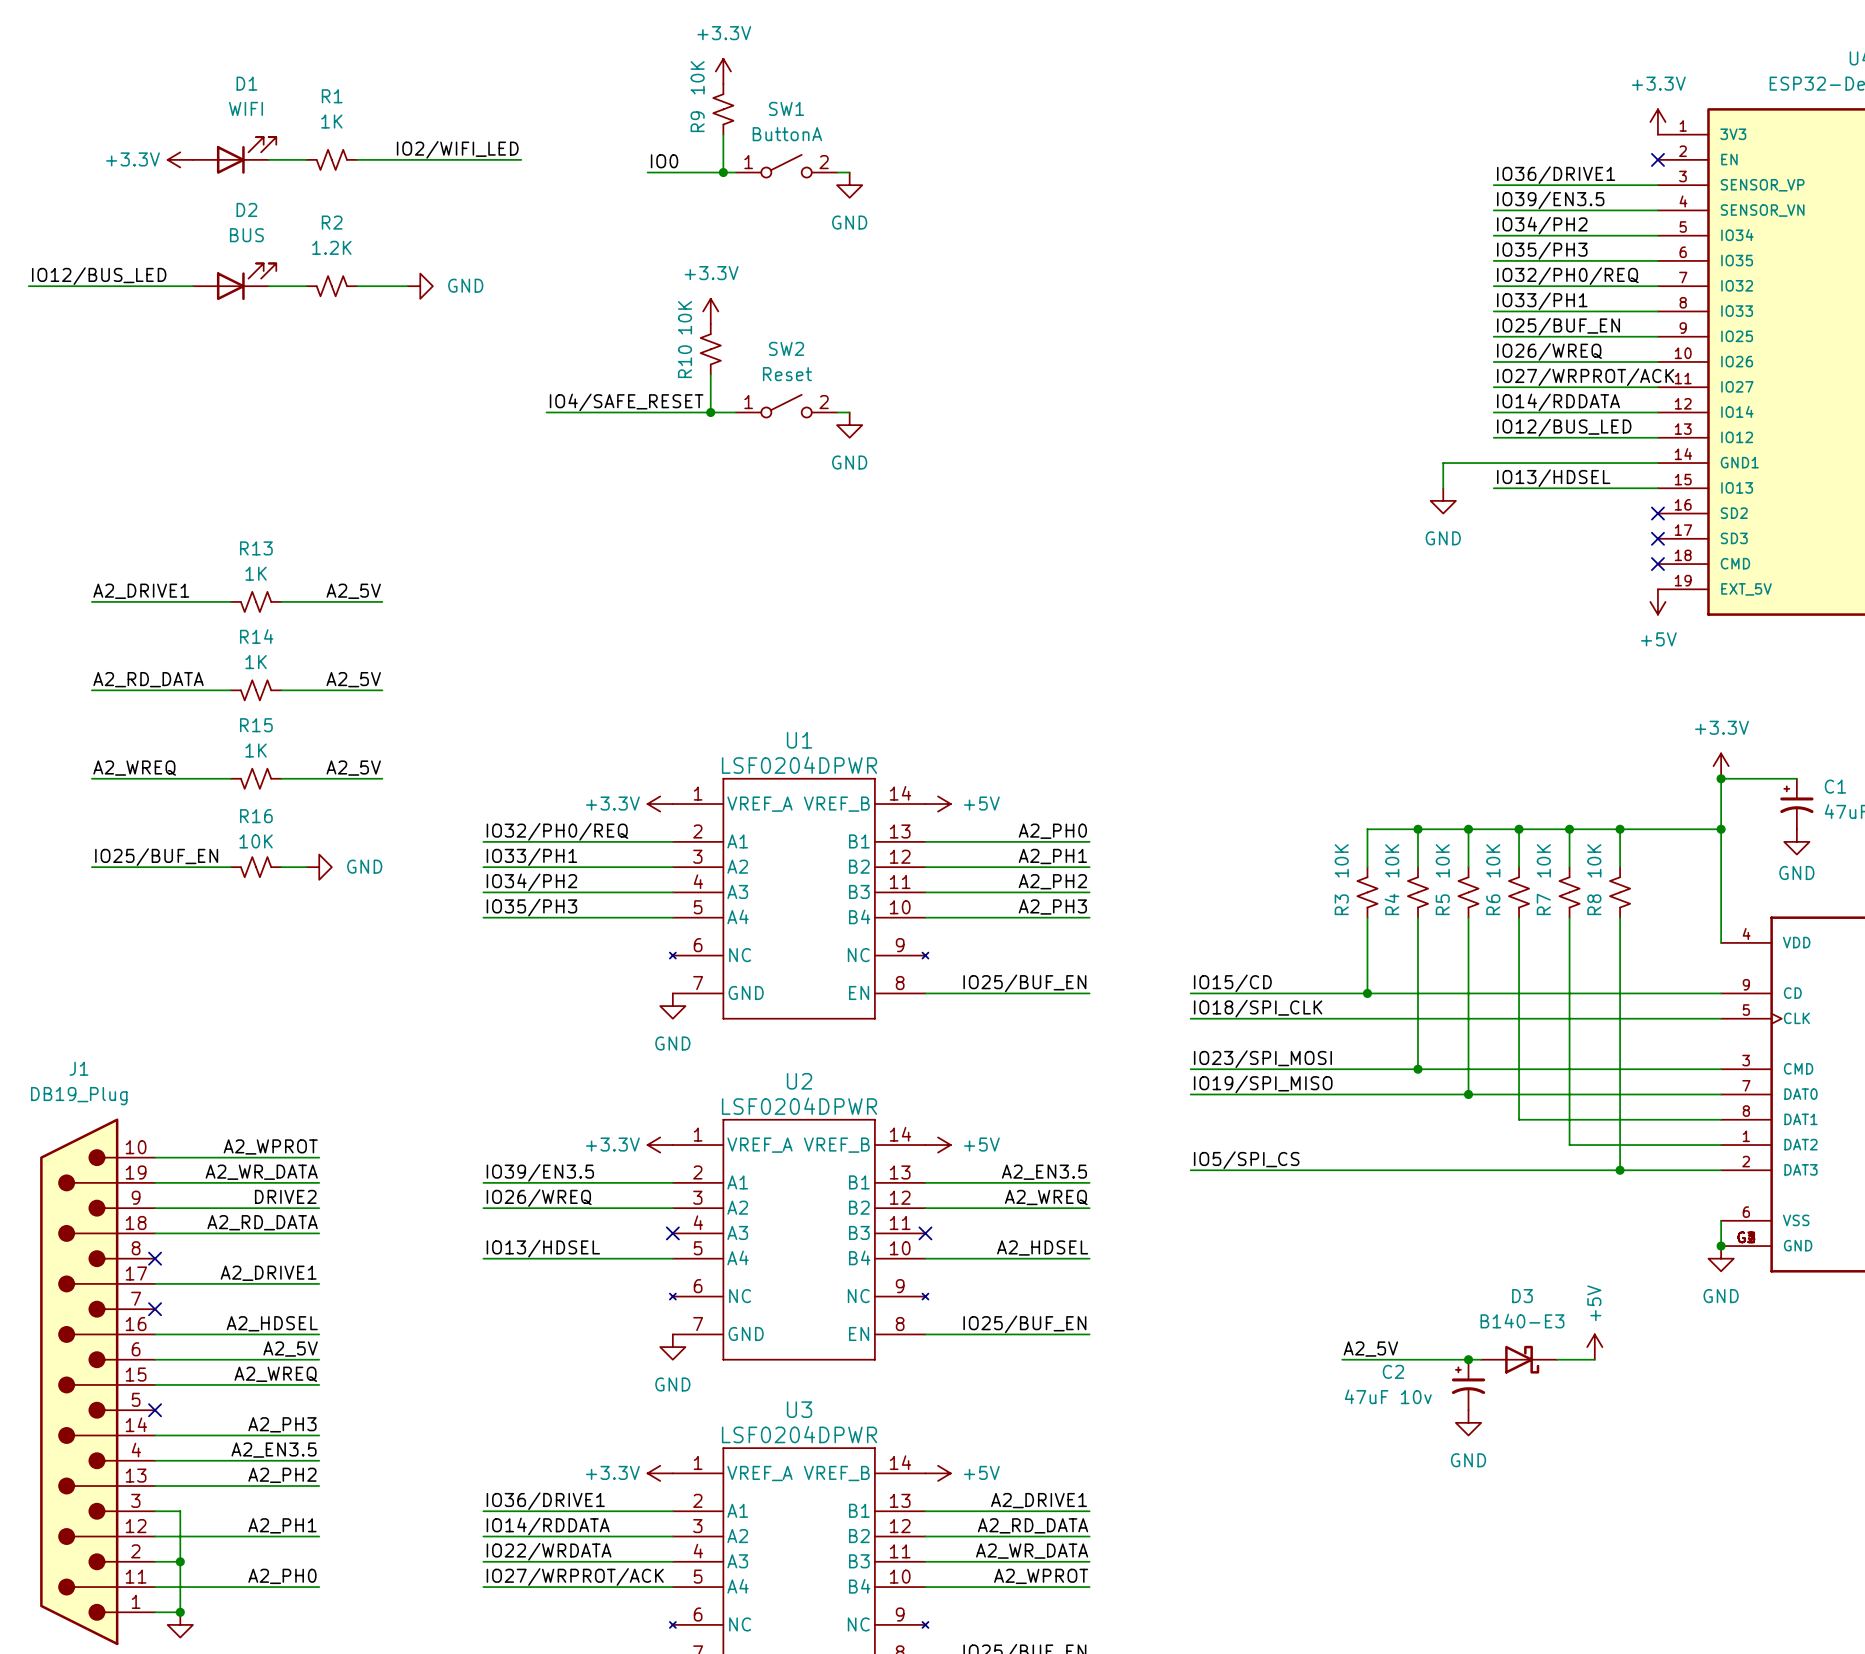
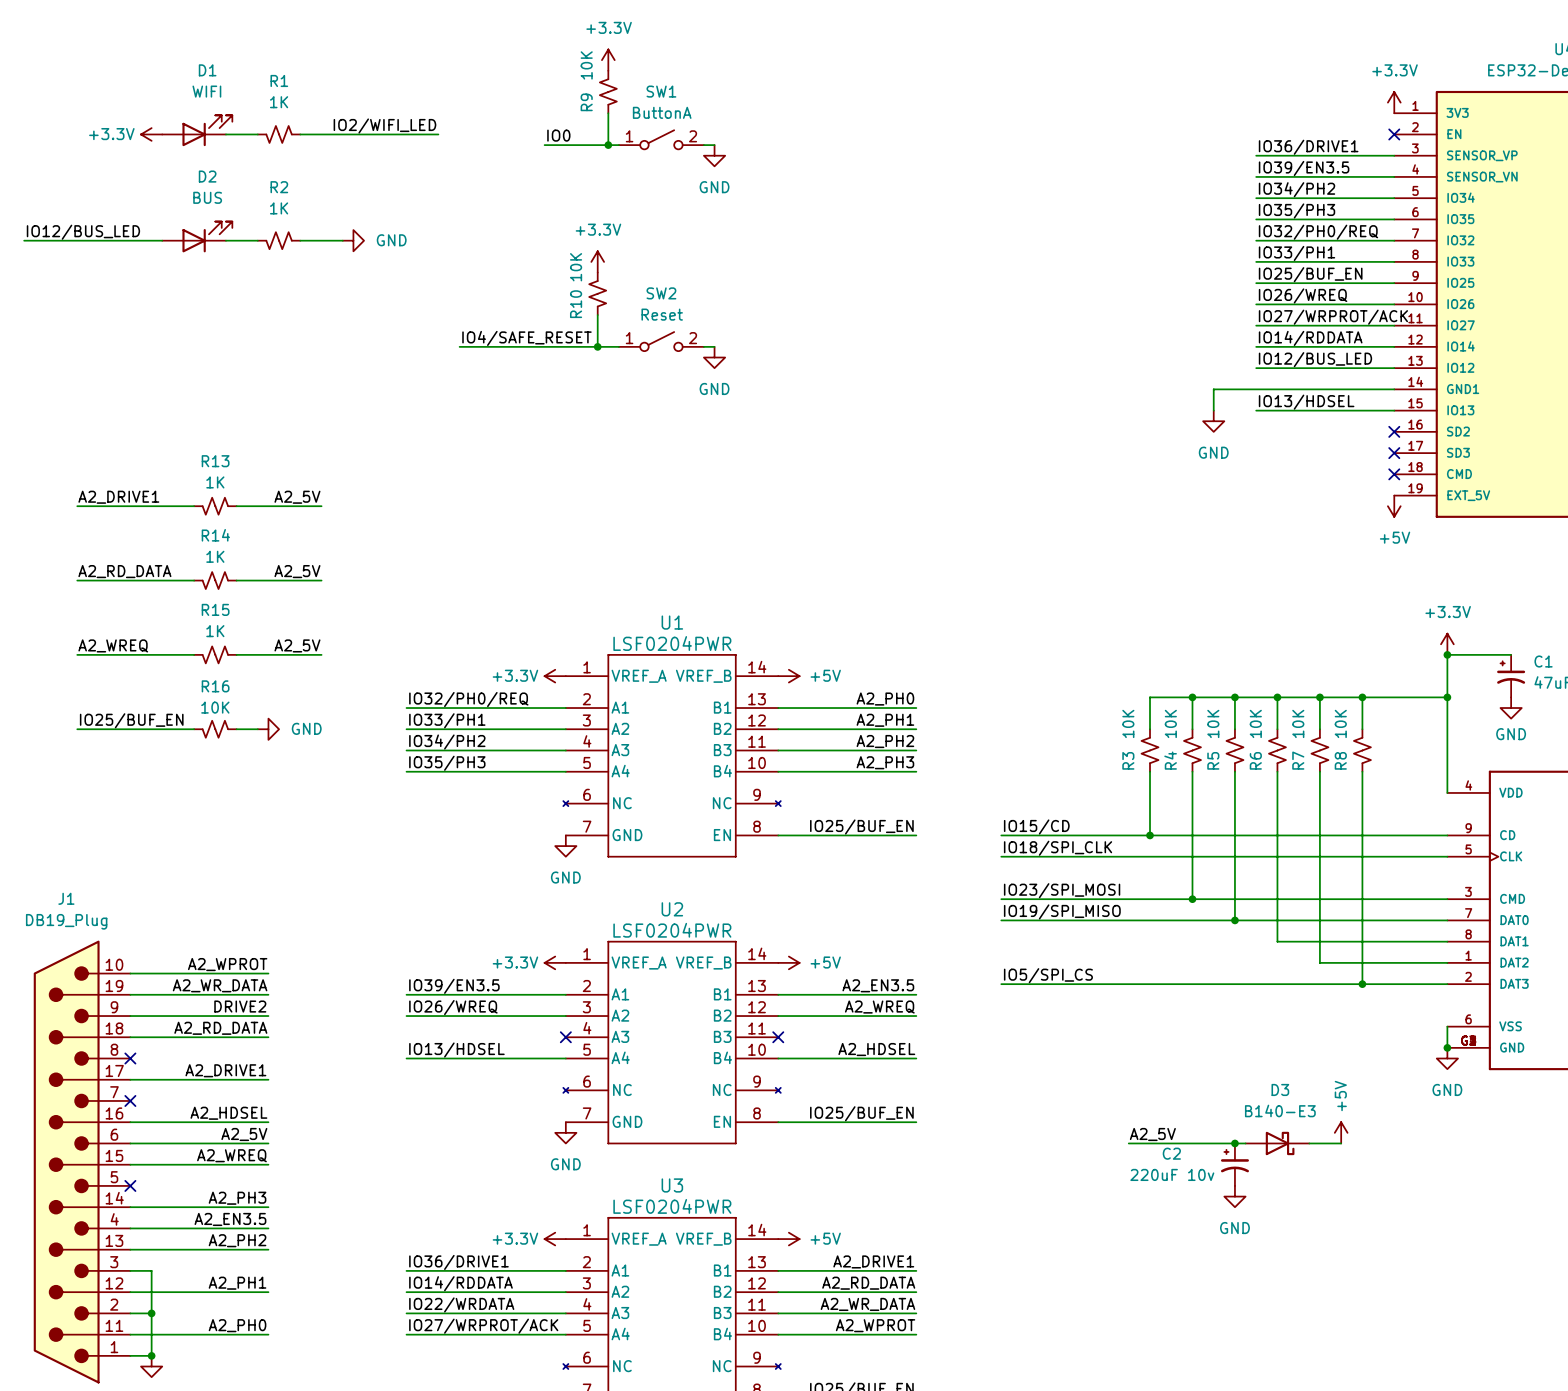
R2 value: 1.2K (331, 247) -> 1K (279, 208)
U1 value: LSF0204DPWR (799, 765) -> LSF0204PWR (672, 643)
U2 value: LSF0204DPWR (799, 1106) -> LSF0204PWR (672, 930)
C2 value: 47uF 10v (1388, 1396) -> 220uF 10v (1172, 1174)
U3 value: LSF0204DPWR (799, 1434) -> LSF0204PWR (672, 1206)

